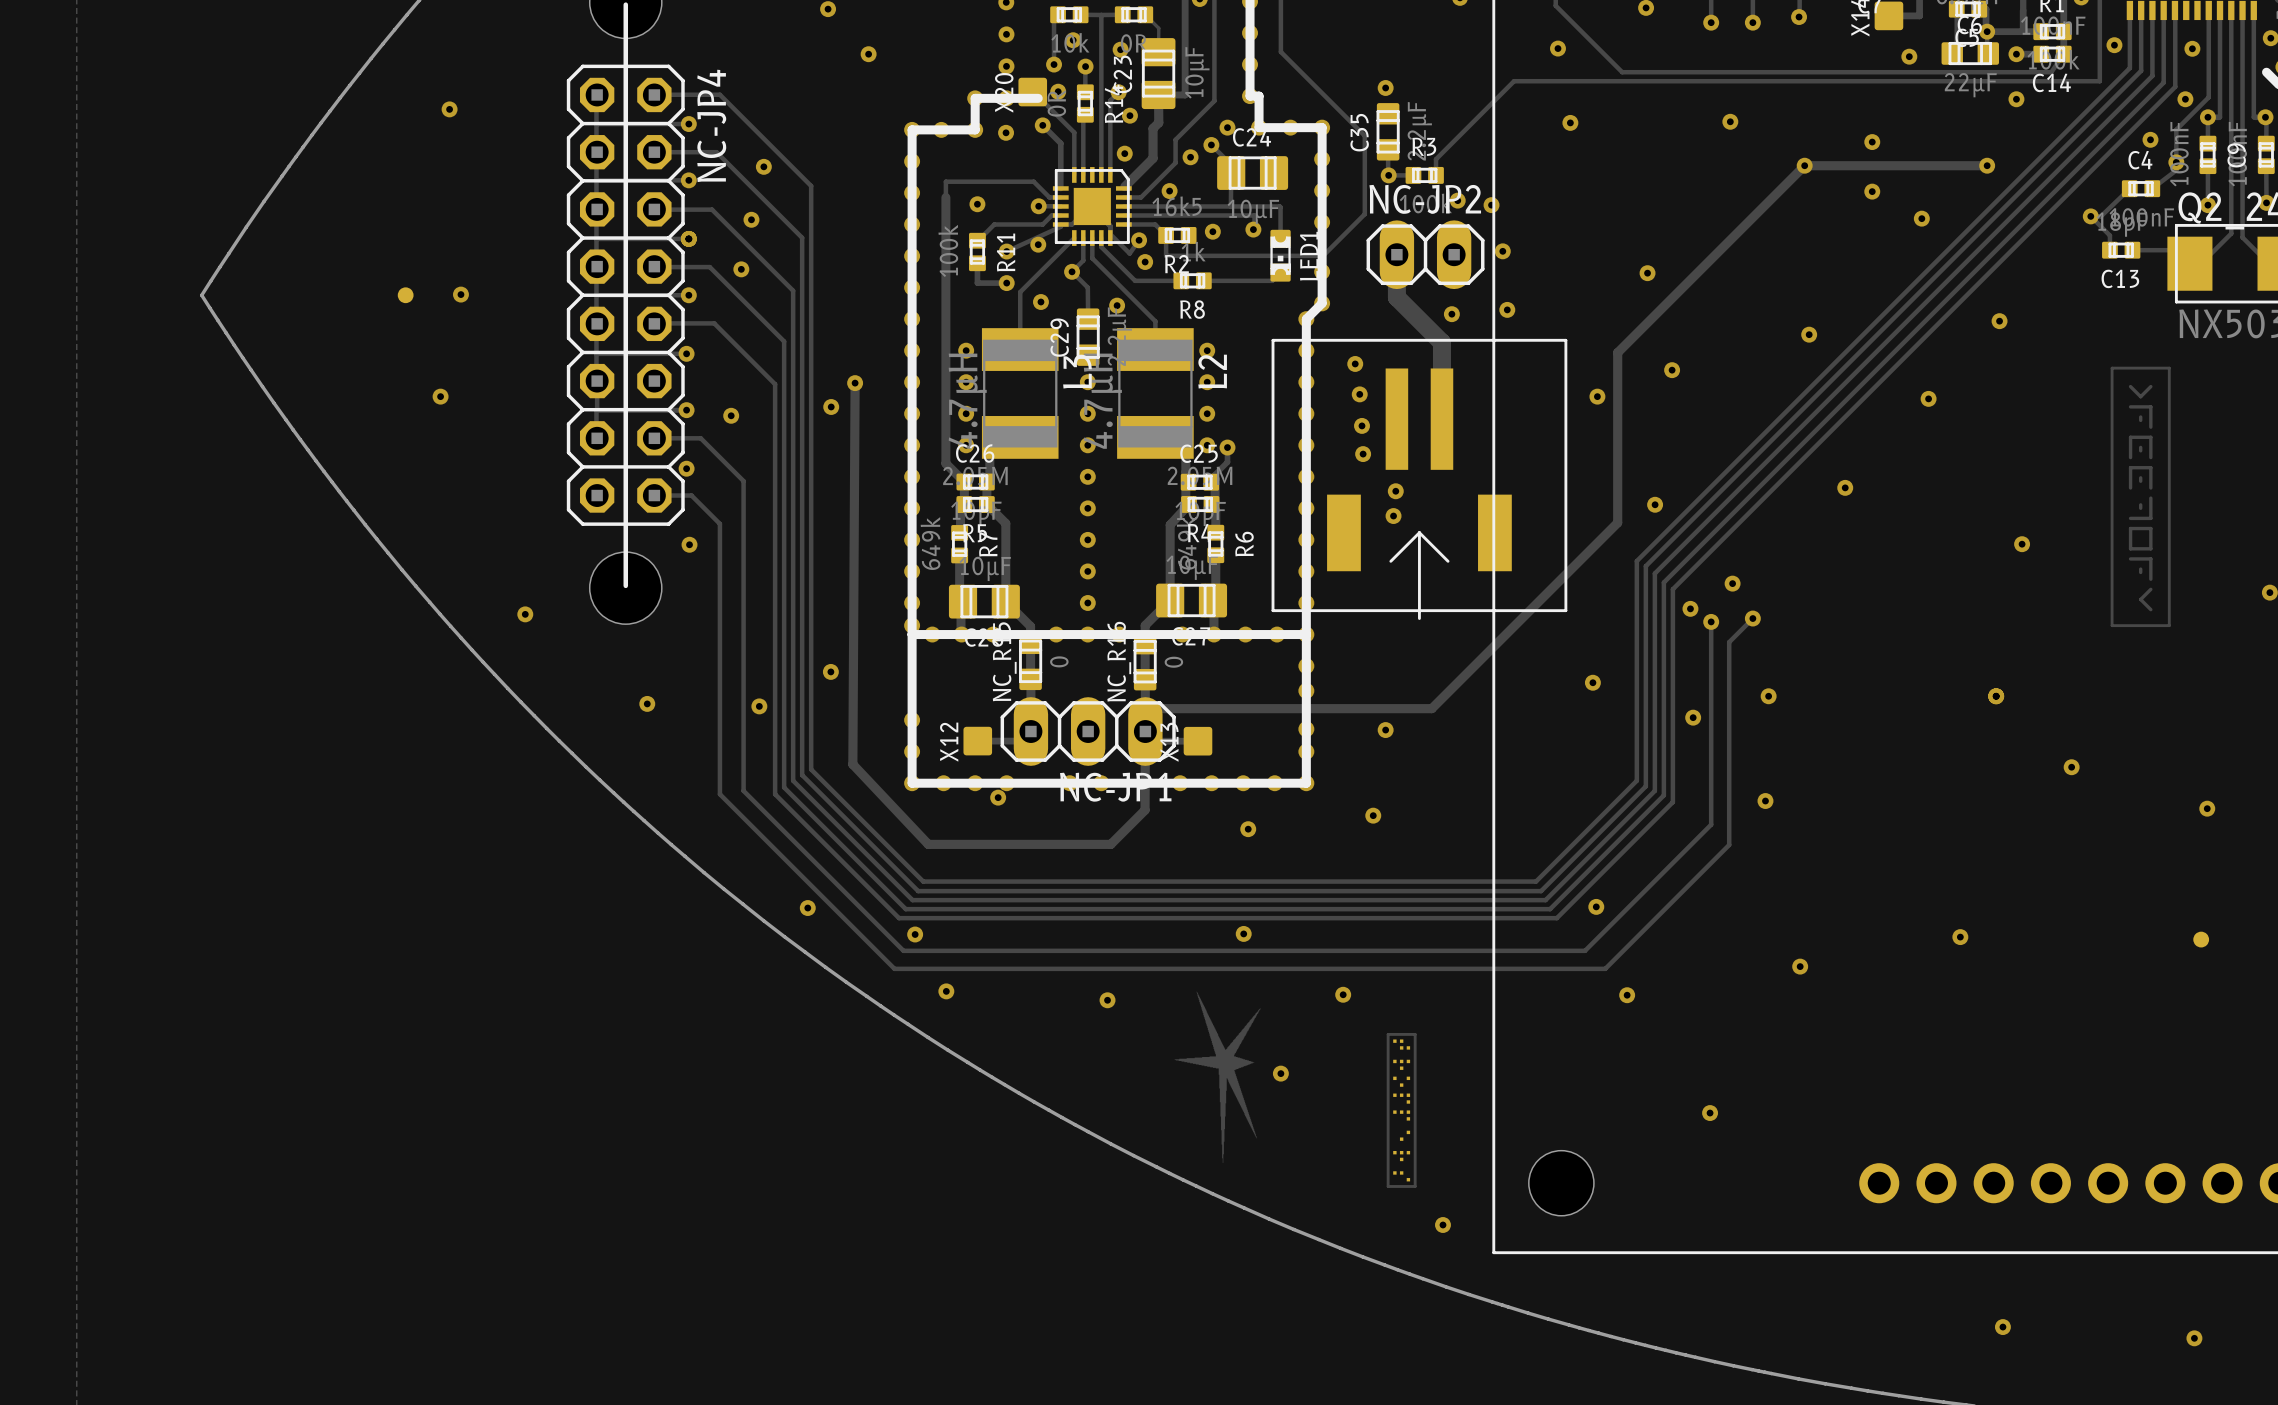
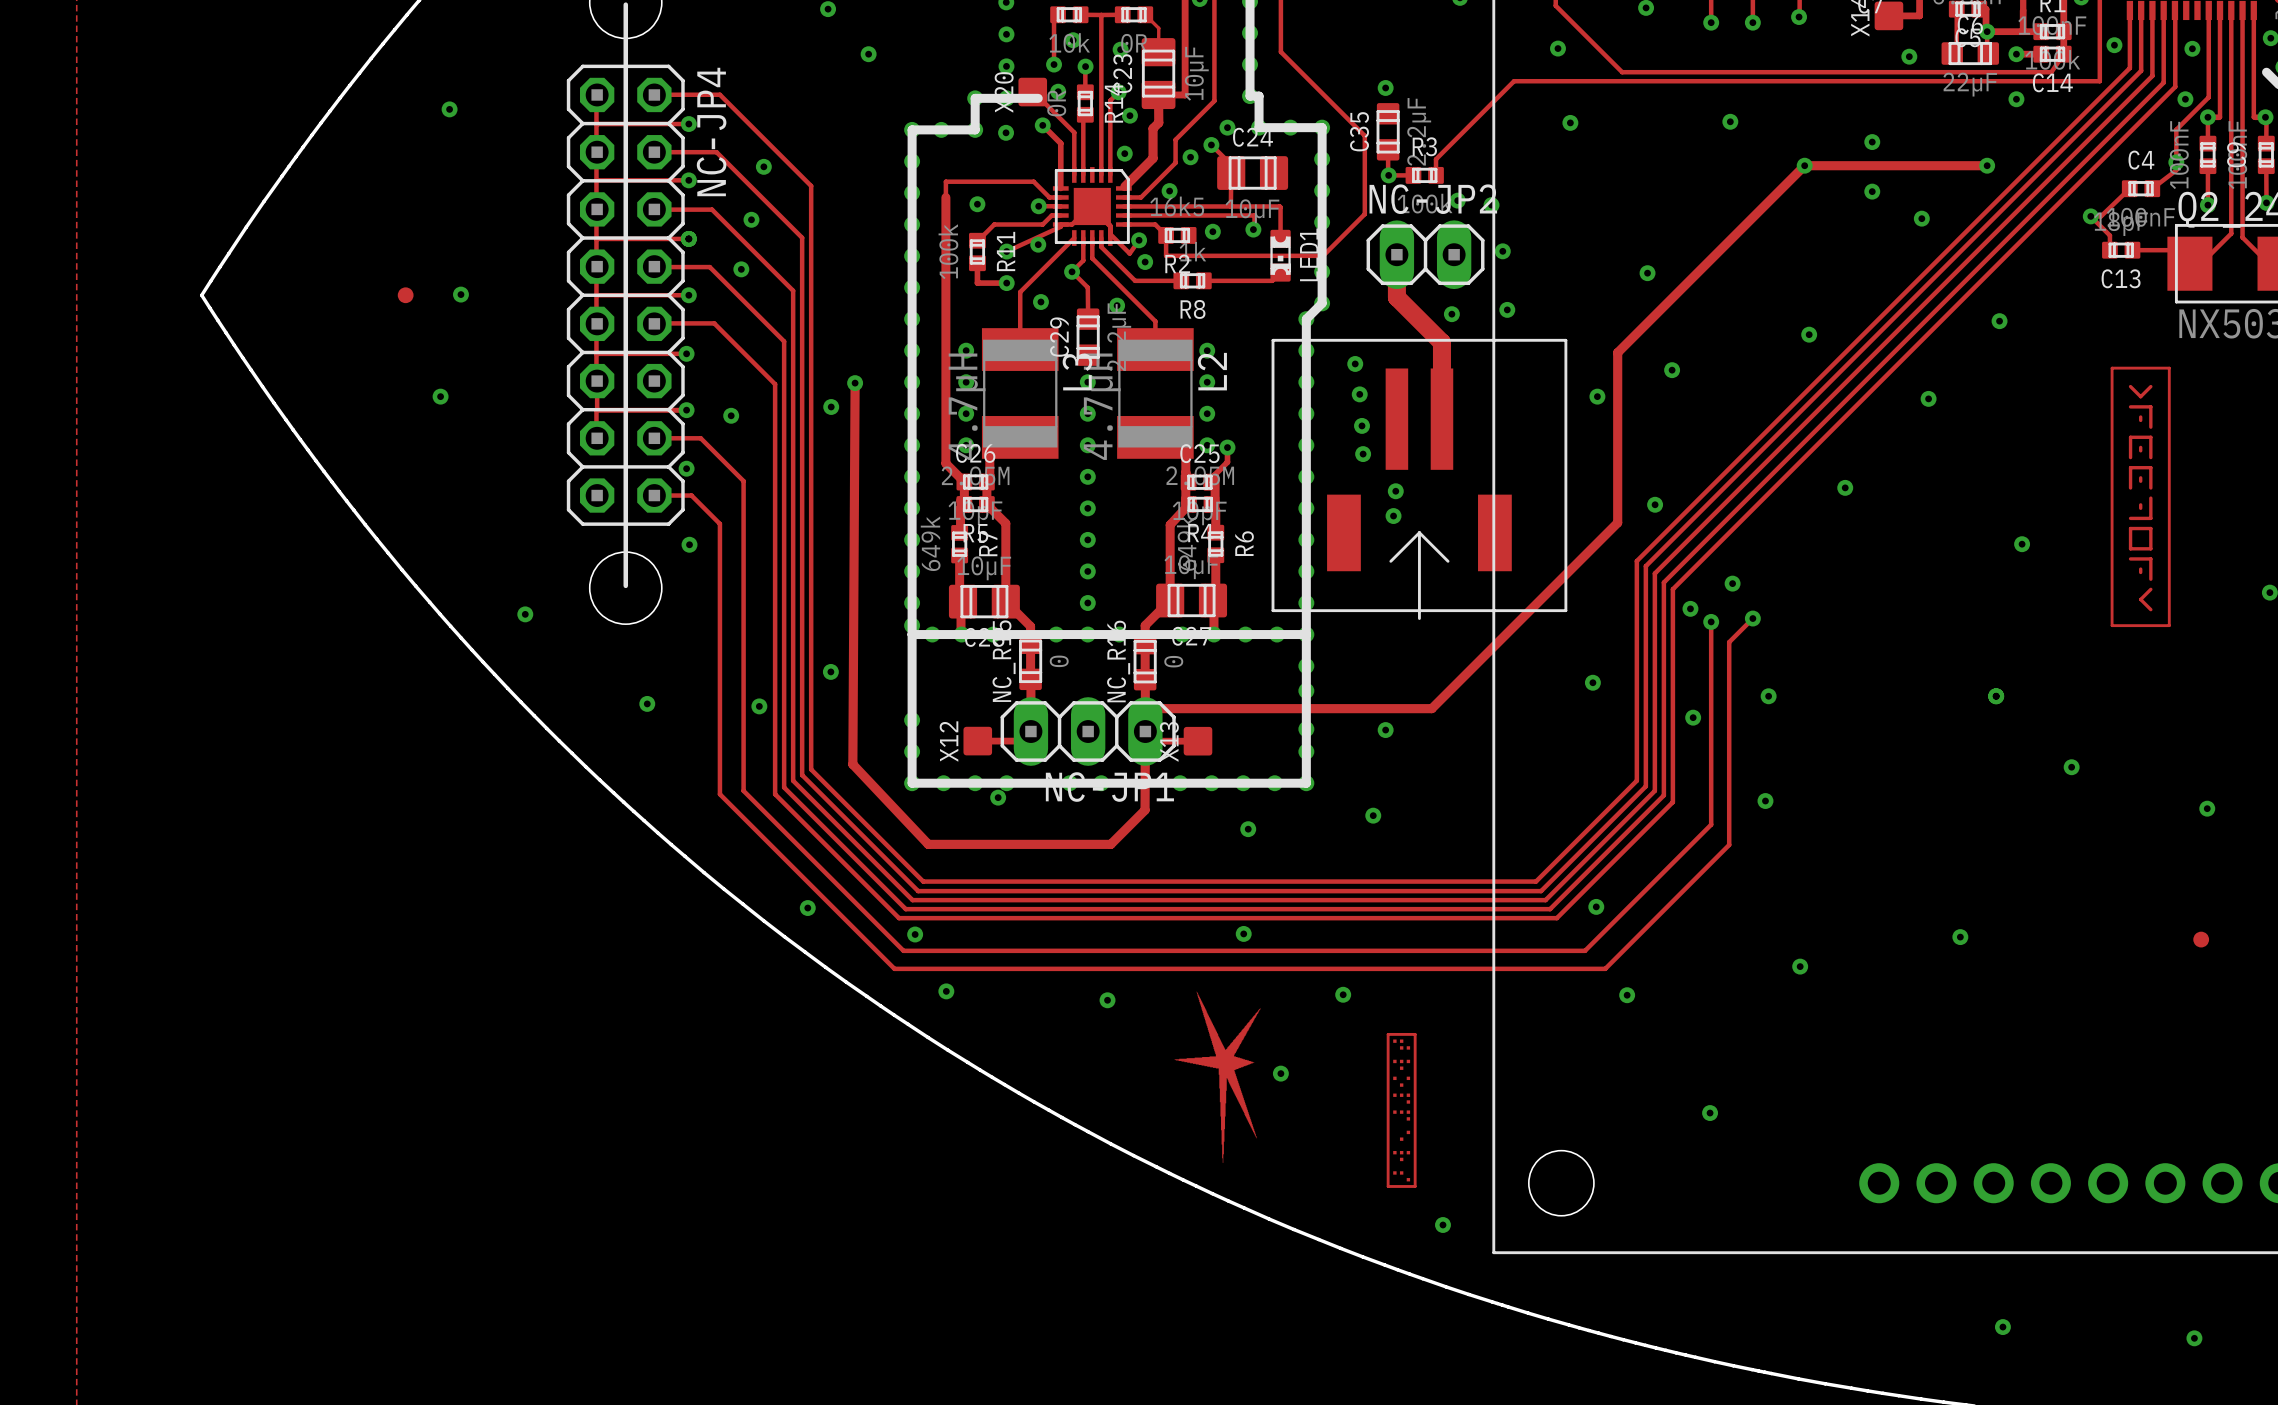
via: (2150, 139) -> none

